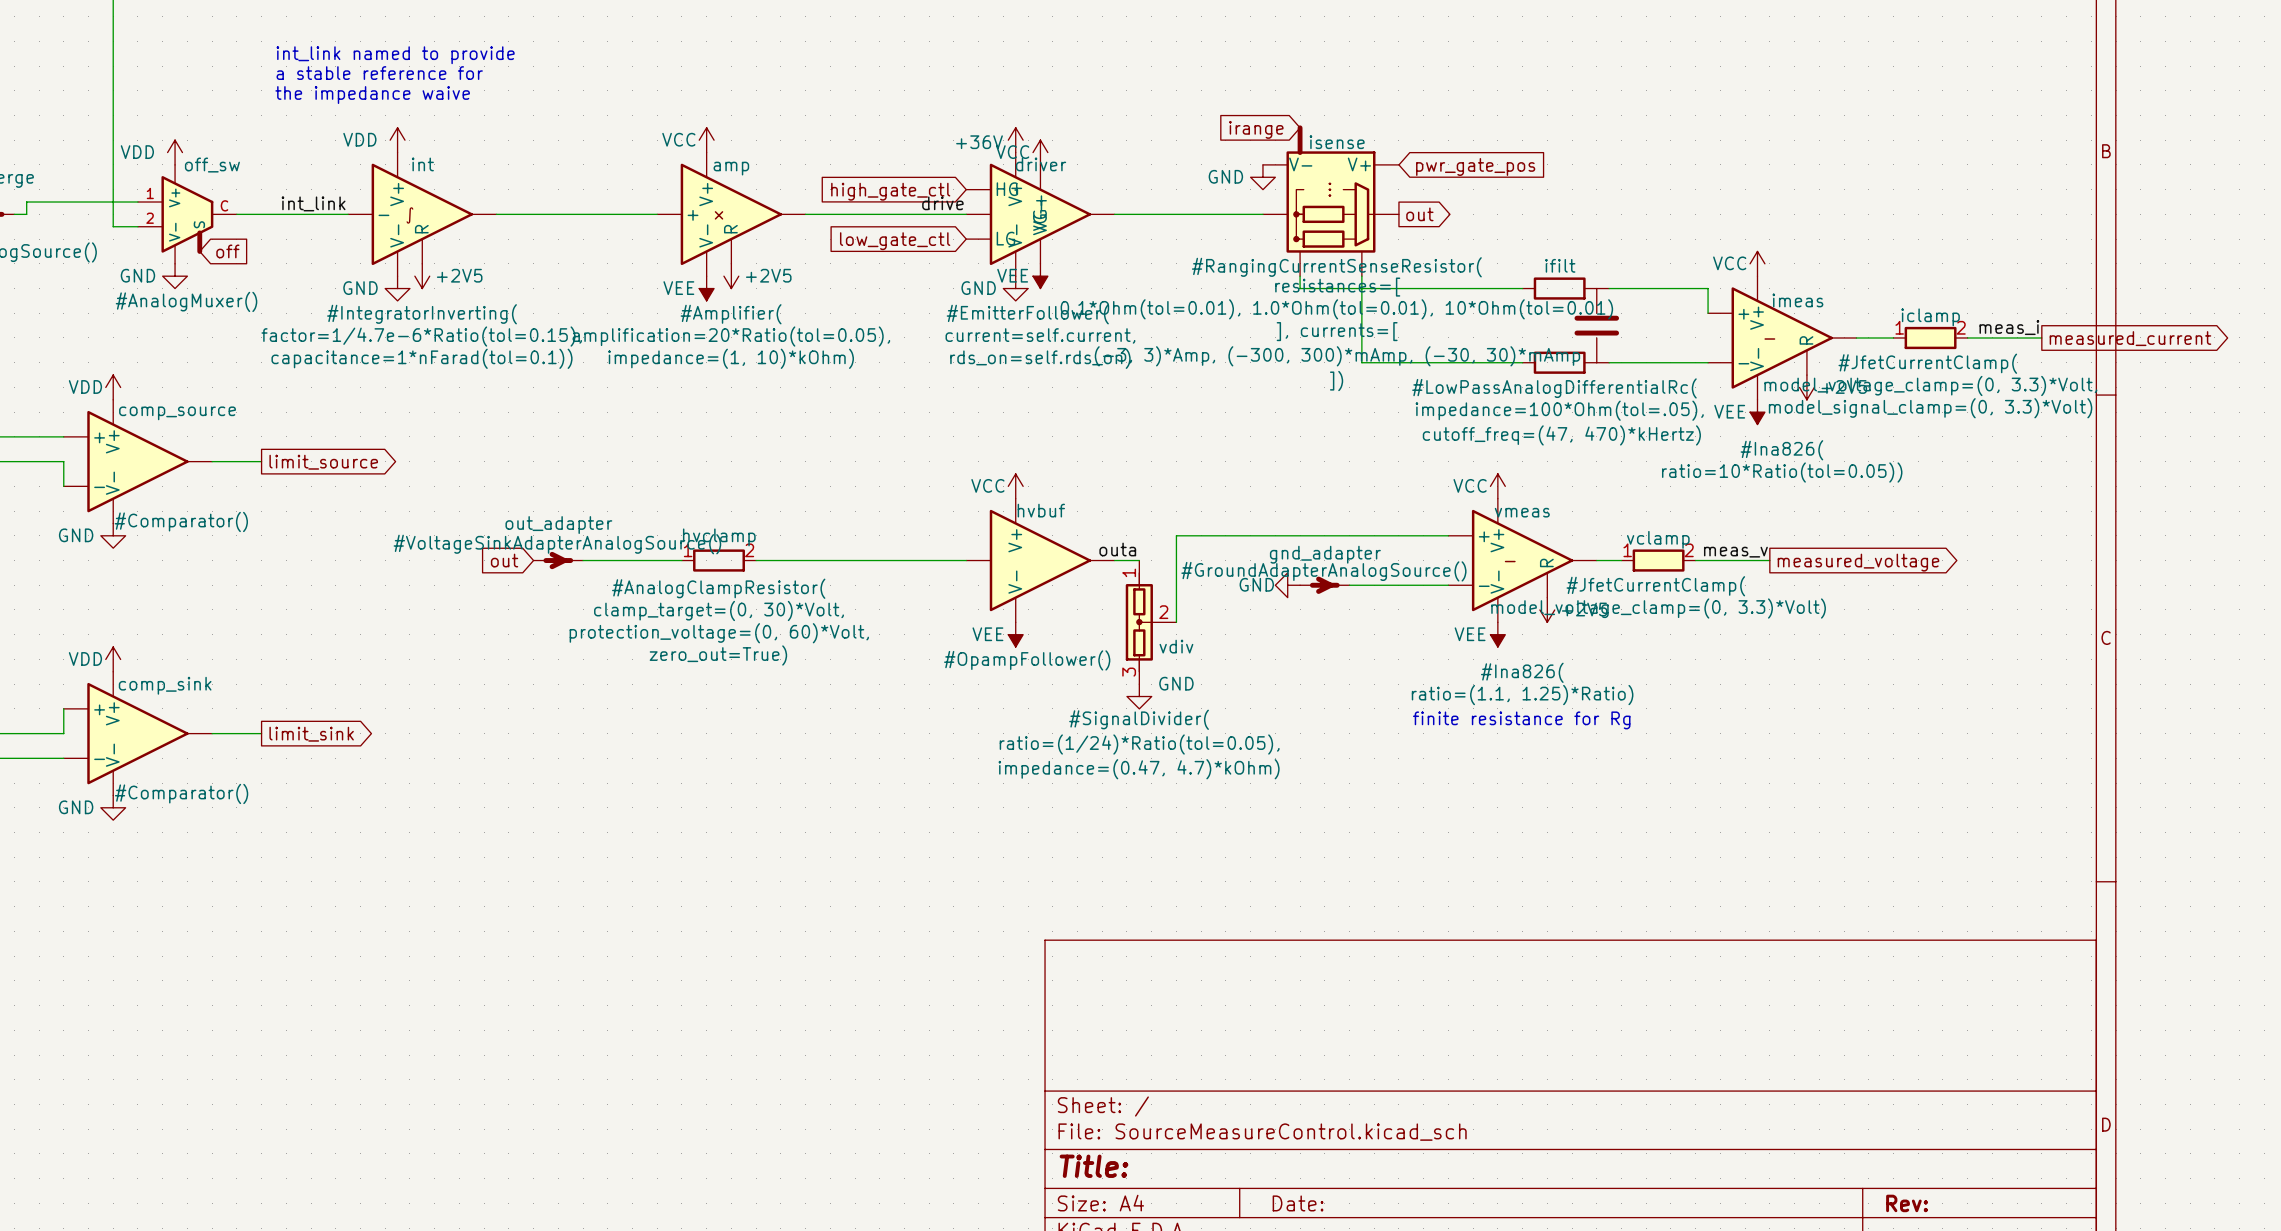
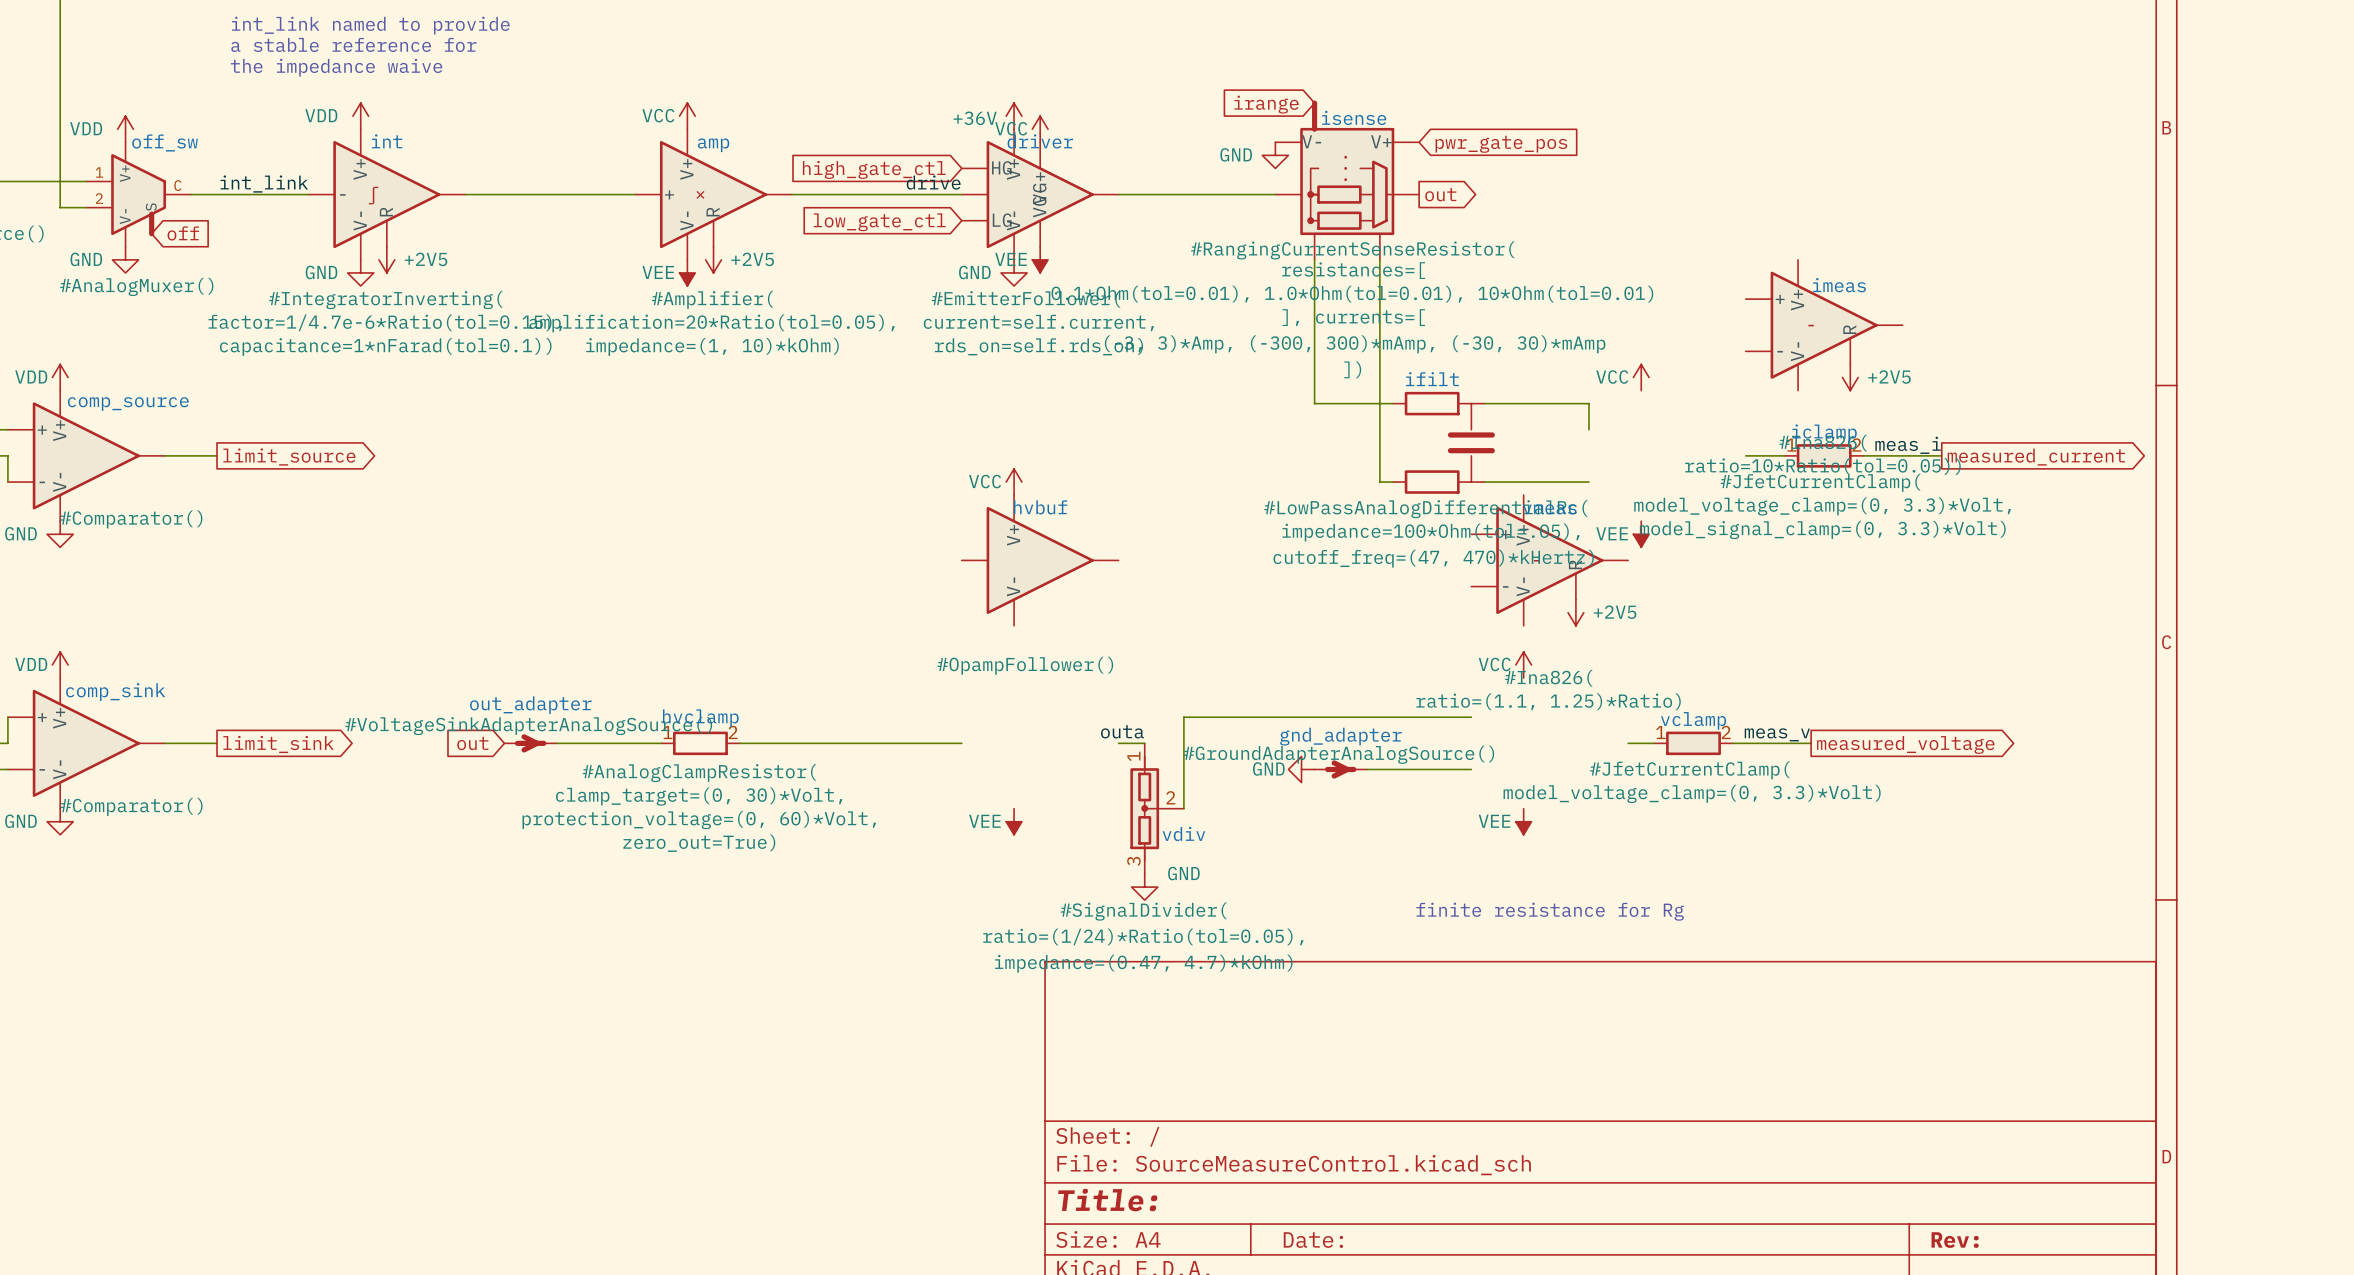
power symbol: VCC (1757, 263) -> none
wire: (1300, 288) (1522, 288) -> (1314, 272) (1314, 403) (1392, 403)
wire: (1609, 288) (1708, 288) (1708, 313) -> (1484, 403) (1588, 403) (1588, 429)
ifilt position: (1570, 325) -> (1443, 442)
label position: meas_i (2009, 327) -> meas_i (1908, 445)
wire: (1856, 337) (1893, 337) -> (1745, 455) (1784, 455)
iclamp position: (1930, 337) -> (1824, 455)
wire: (1967, 337) (2041, 337) -> (1863, 455) (1941, 455)
global label position: measured_current (2130, 338) -> measured_current (2036, 457)
wire: (1361, 362) (1522, 362) -> (1379, 351) (1379, 482) (1392, 482)
wire: (1609, 362) (1708, 362) -> (1484, 482) (1588, 482)
power symbol: none -> VCC (1641, 377)
power symbol: VEE (1757, 412) -> none
power symbol: VCC (1497, 486) -> none
wire: (1448, 535) (1176, 535) (1176, 622) -> (1471, 717) (1183, 717) (1183, 808)
power symbol: none -> VEE (1641, 534)
label position: outa (1117, 549) -> outa (1122, 731)
label position: meas_v (1735, 552) -> meas_v (1777, 734)
global label position: out (504, 560) -> out (472, 743)
out_adapter position: (558, 560) -> (530, 743)
wire: (583, 560) (681, 560) -> (556, 743) (661, 743)
hvclamp position: (719, 560) -> (700, 743)
wire: (756, 560) (966, 560) -> (739, 743) (961, 743)
wire: (1114, 560) (1139, 560) -> (1118, 743) (1144, 743)
wire: (1596, 560) (1621, 560) -> (1628, 743) (1654, 743)
vclamp position: (1658, 560) -> (1693, 743)
wire: (1695, 560) (1769, 560) -> (1732, 743) (1811, 743)
global label position: measured_voltage (1858, 562) -> measured_voltage (1905, 744)
power symbol: GND (1287, 585) -> none
gnd_adapter position: (1324, 585) -> (1340, 769)
wire: (1349, 585) (1448, 585) -> (1366, 769) (1471, 769)
vdiv position: (1151, 622) -> (1157, 808)
power symbol position: VEE (1015, 634) -> VEE (1014, 821)
power symbol: VEE (1497, 634) -> none
power symbol: none -> VCC (1523, 664)
power symbol: GND (1139, 696) -> none
text position: finite resistance for Rg (1521, 720) -> finite resistance for Rg (1550, 911)
power symbol: none -> GND (1301, 769)
power symbol: none -> VEE (1523, 821)
power symbol: none -> GND (1144, 887)

